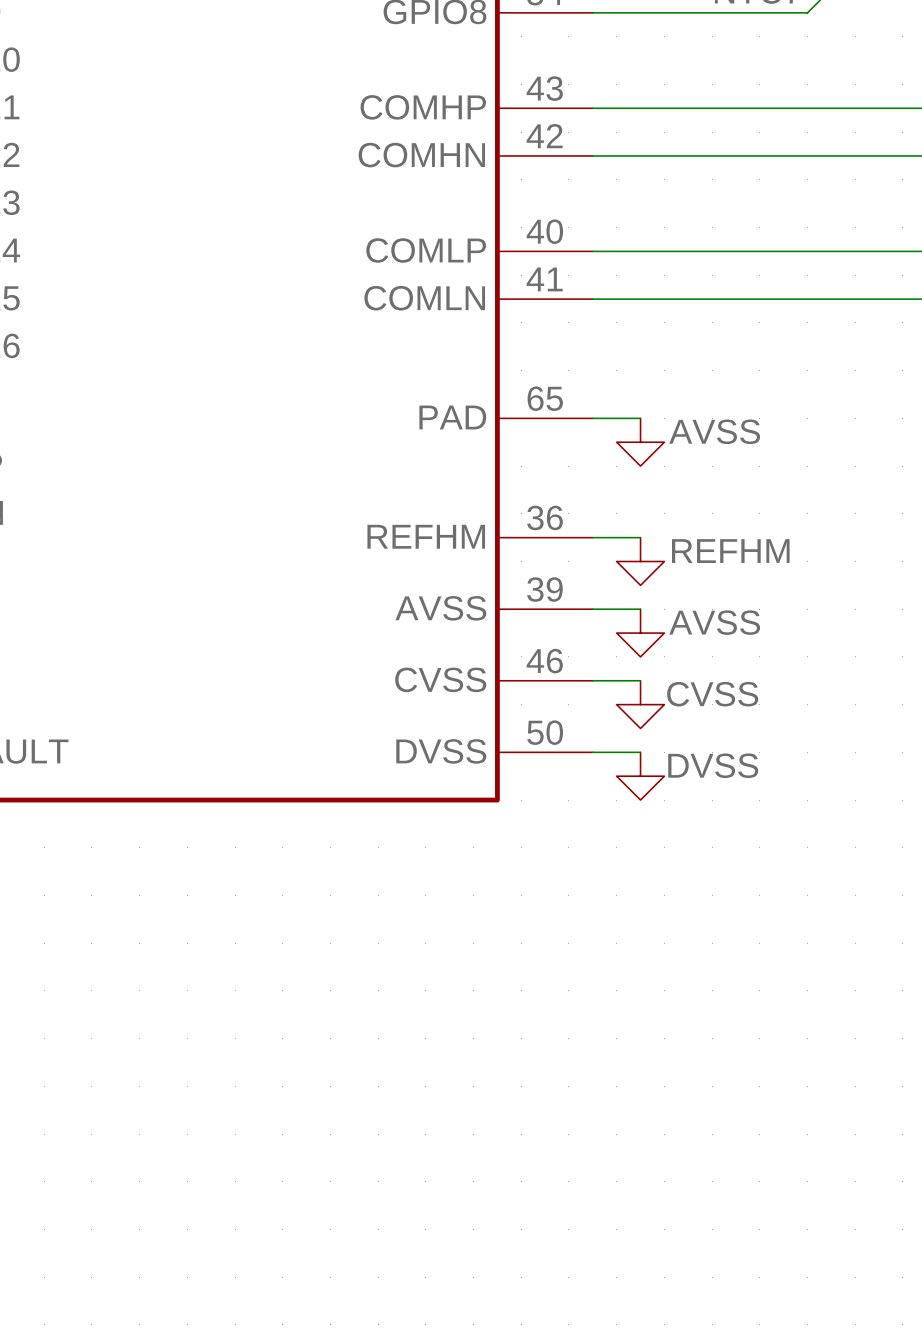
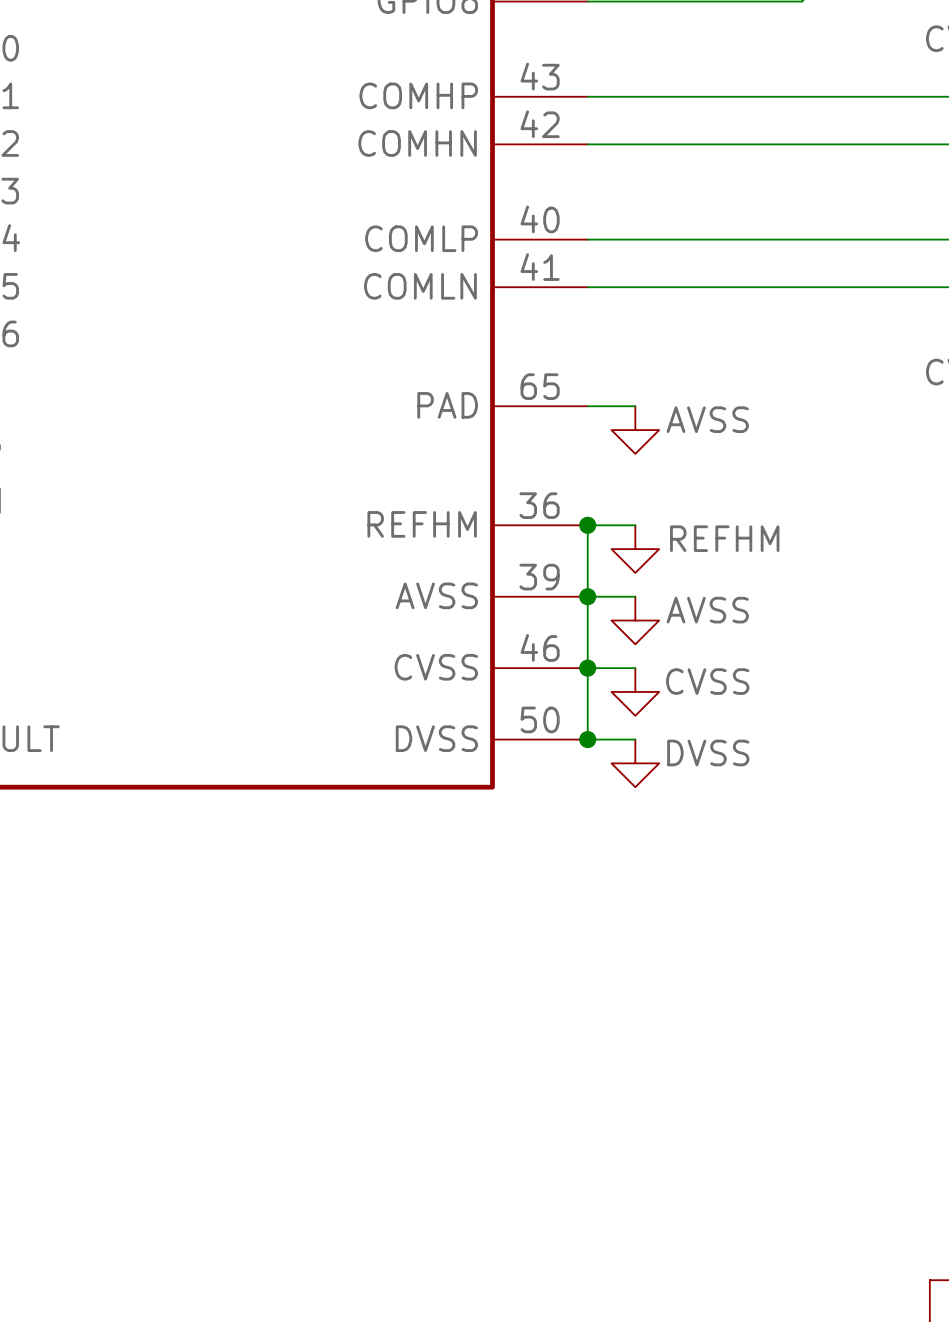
wire: none -> (587, 525) (587, 739)
junction: none -> (587, 525)
junction: none -> (587, 596)
junction: none -> (587, 668)
junction: none -> (587, 739)

